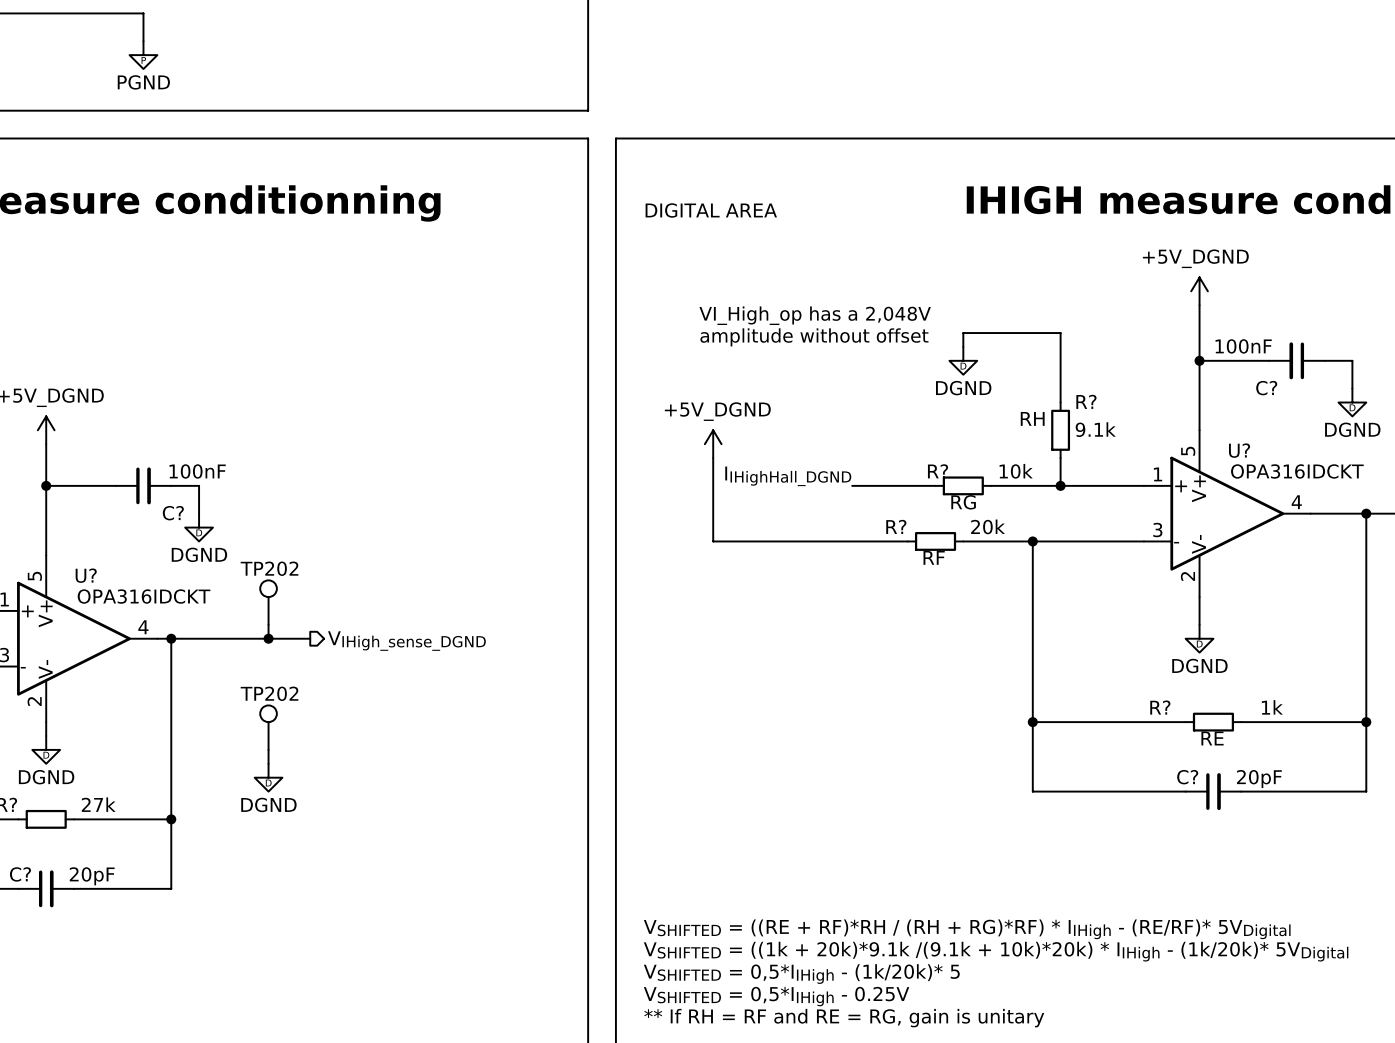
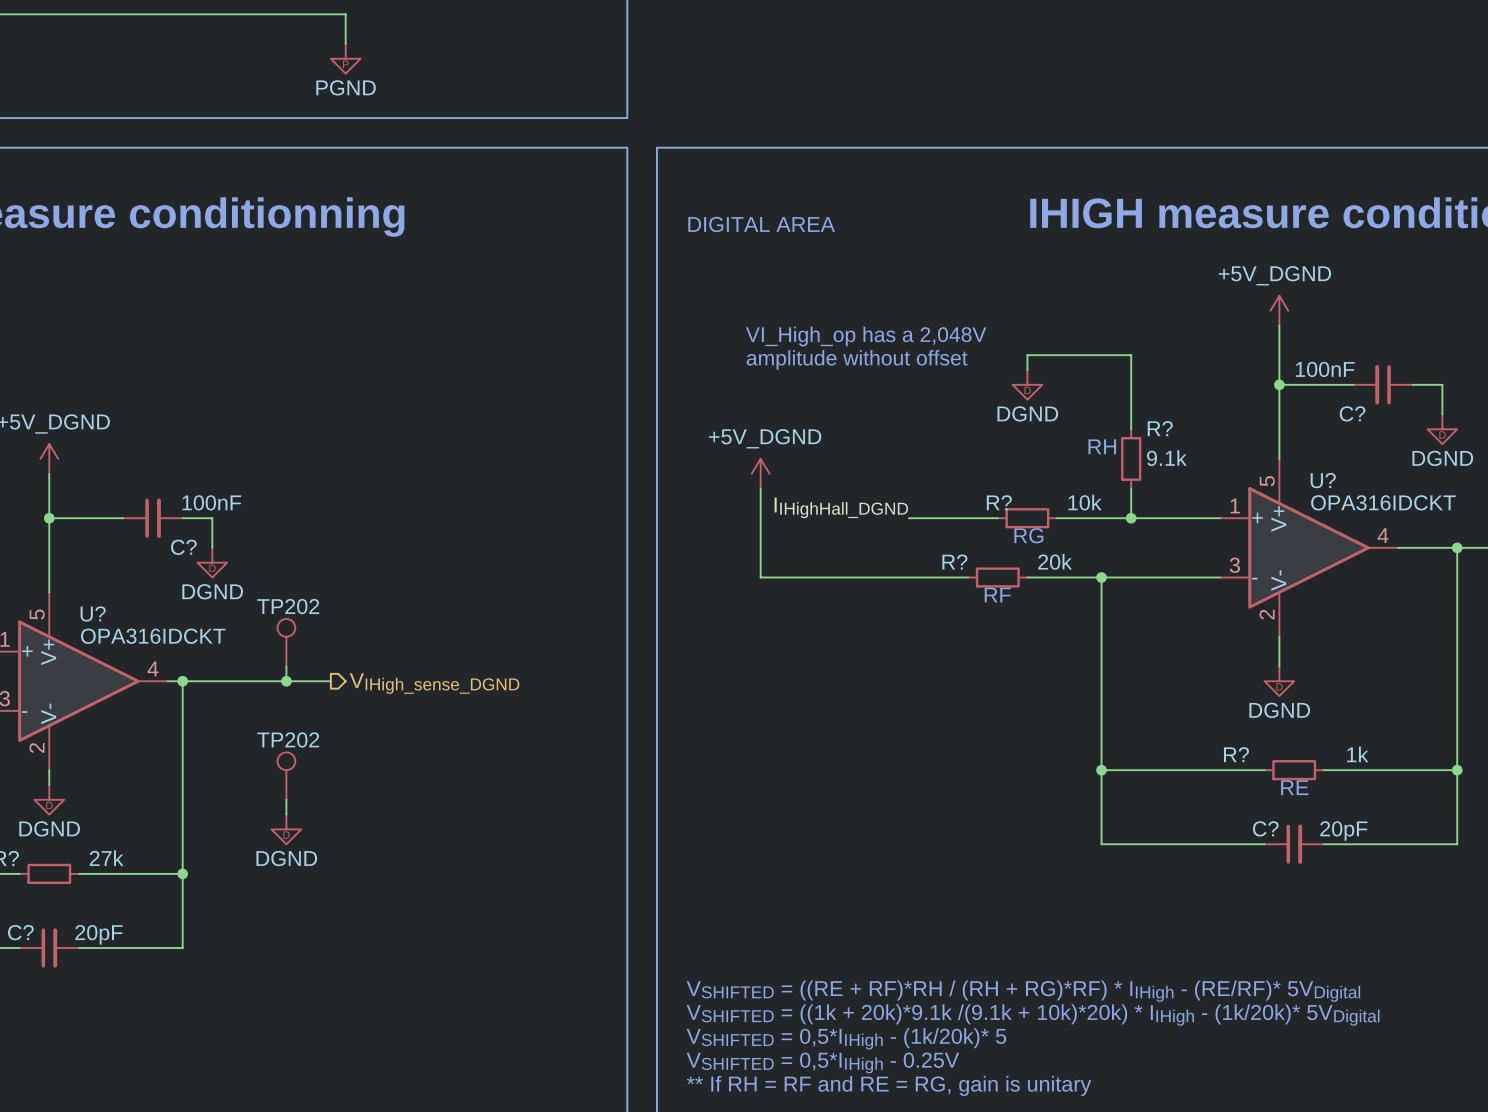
wire: (143, 13) (143, 41) -> (153, 14) (345, 14) (345, 43)
power symbol position: PGND (143, 55) -> PGND (345, 58)

